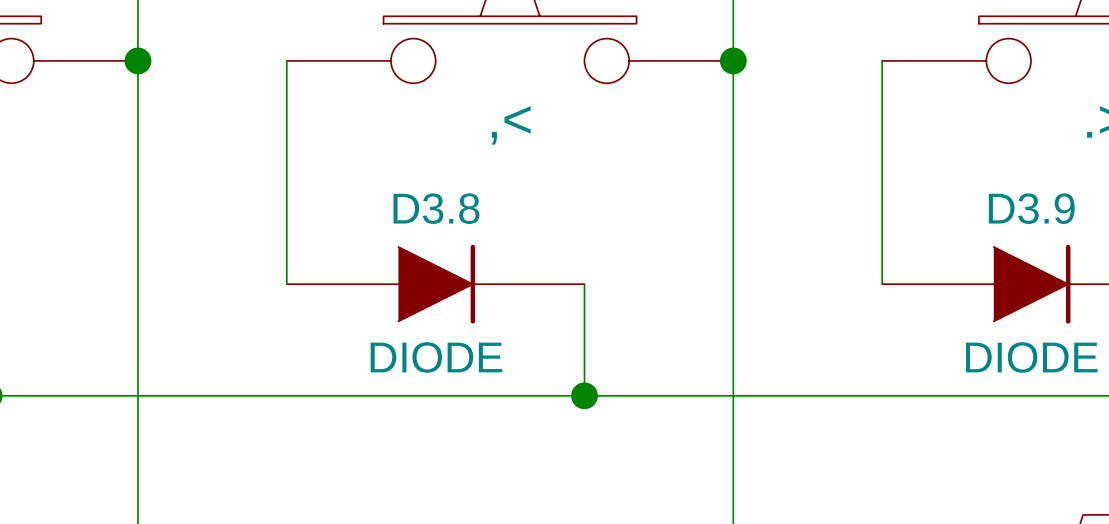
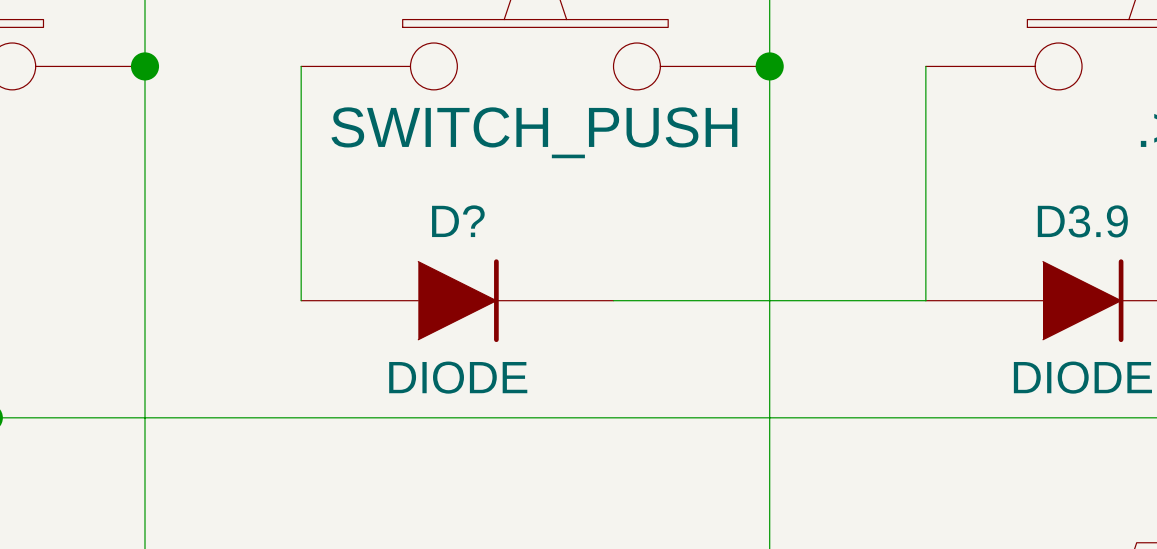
part value: ,< (511, 125) -> SWITCH_PUSH (534, 132)
D3.8 name: D3.8 (436, 208) -> D? (458, 221)
wire: (584, 284) (584, 395) -> (613, 300) (925, 300)
junction: (584, 395) -> none

